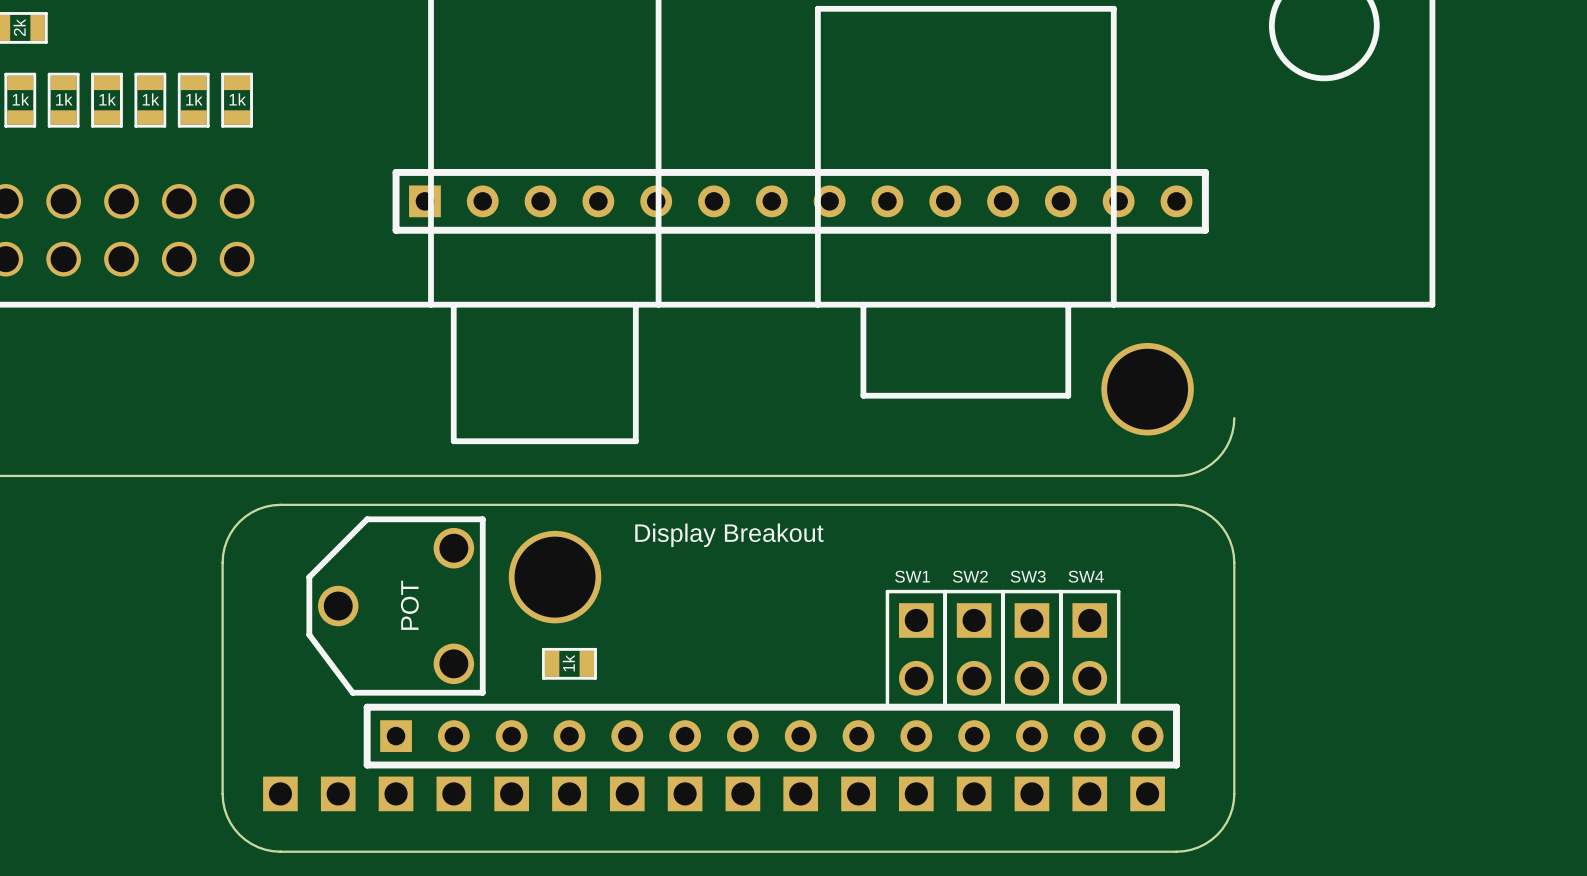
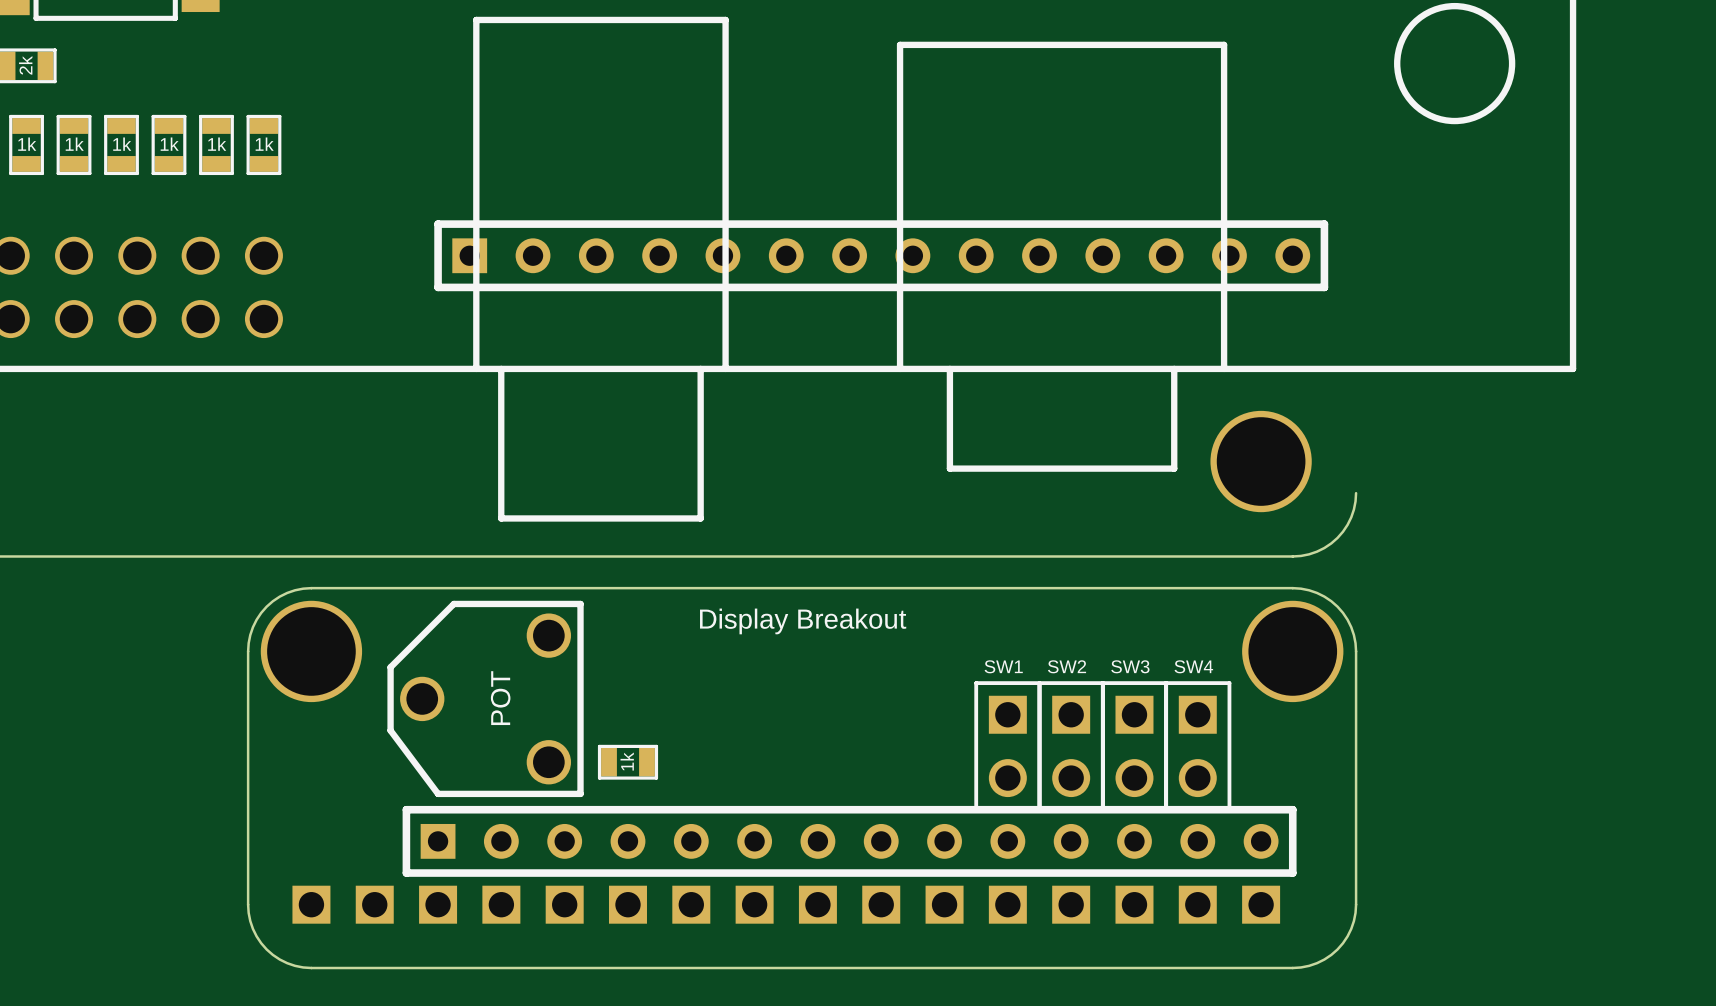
part: none -> (1292, 651)
part position: (555, 577) -> (311, 651)
part position: (396, 606) -> (485, 698)

